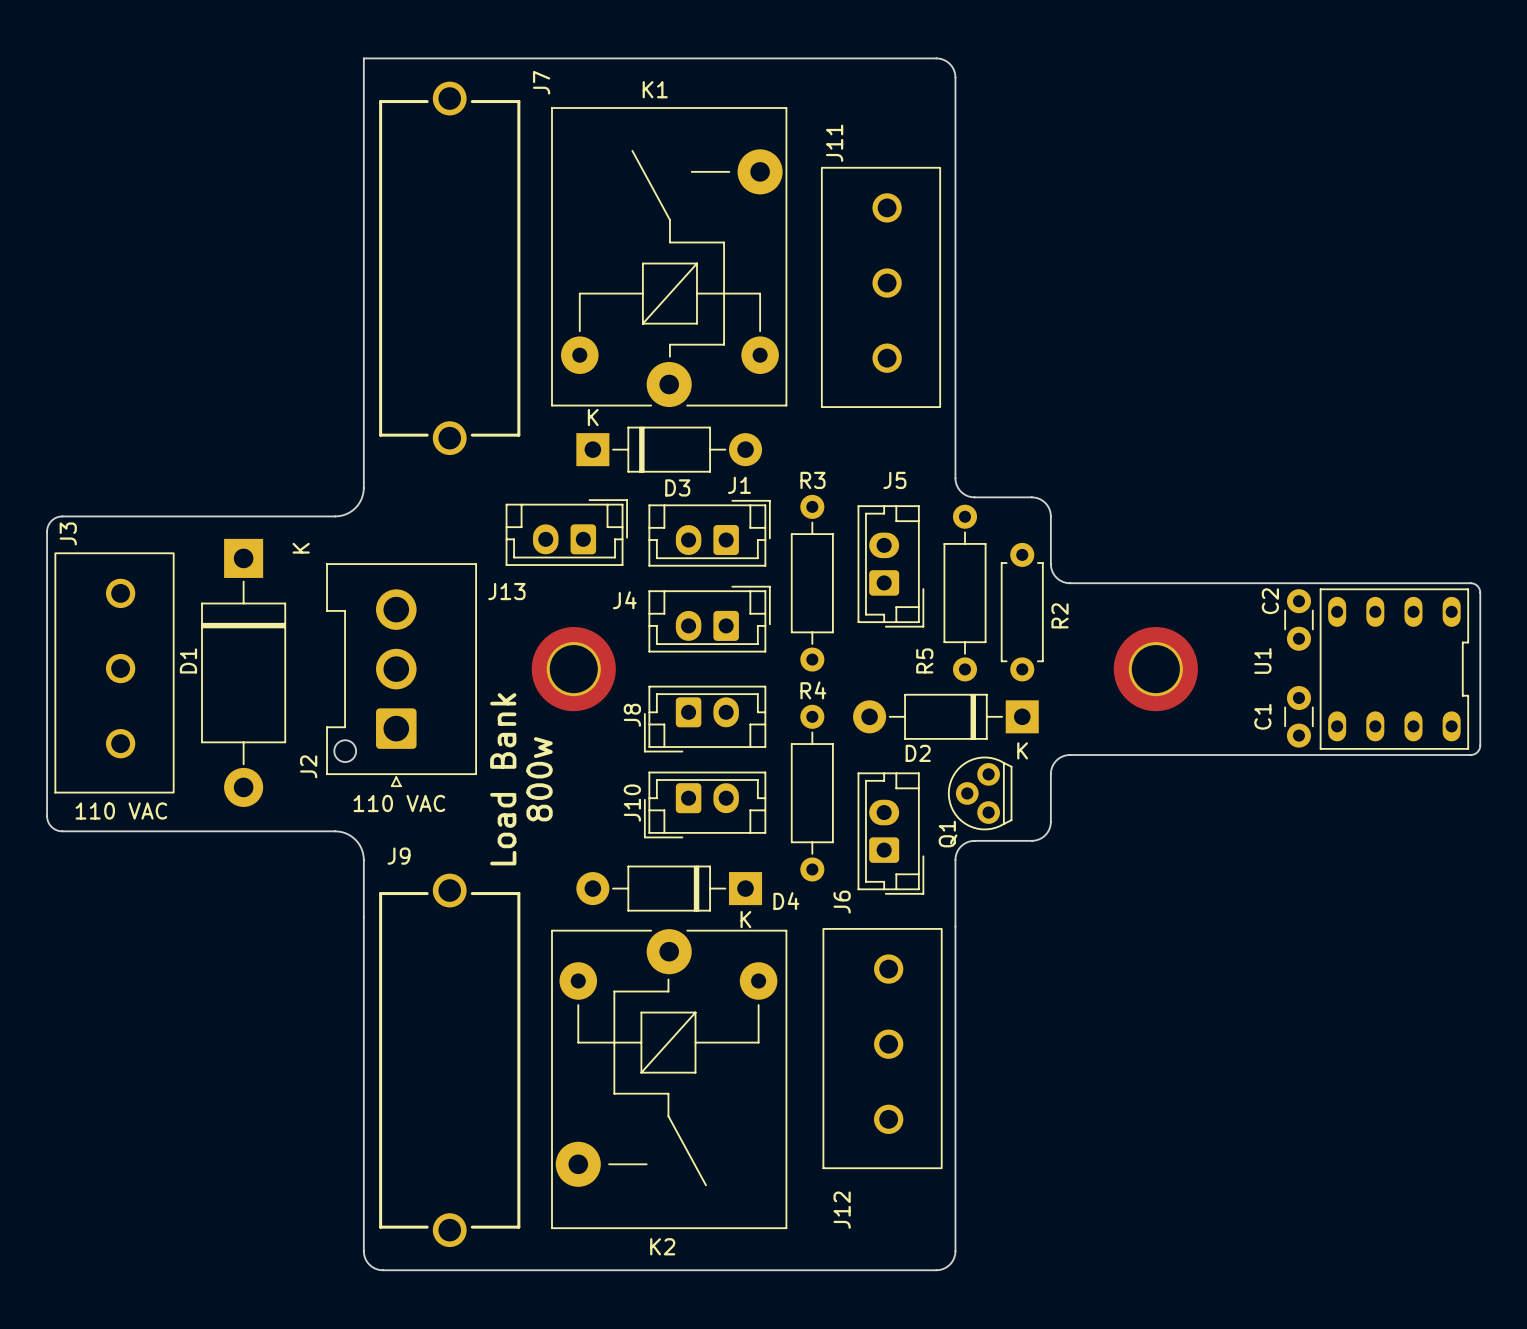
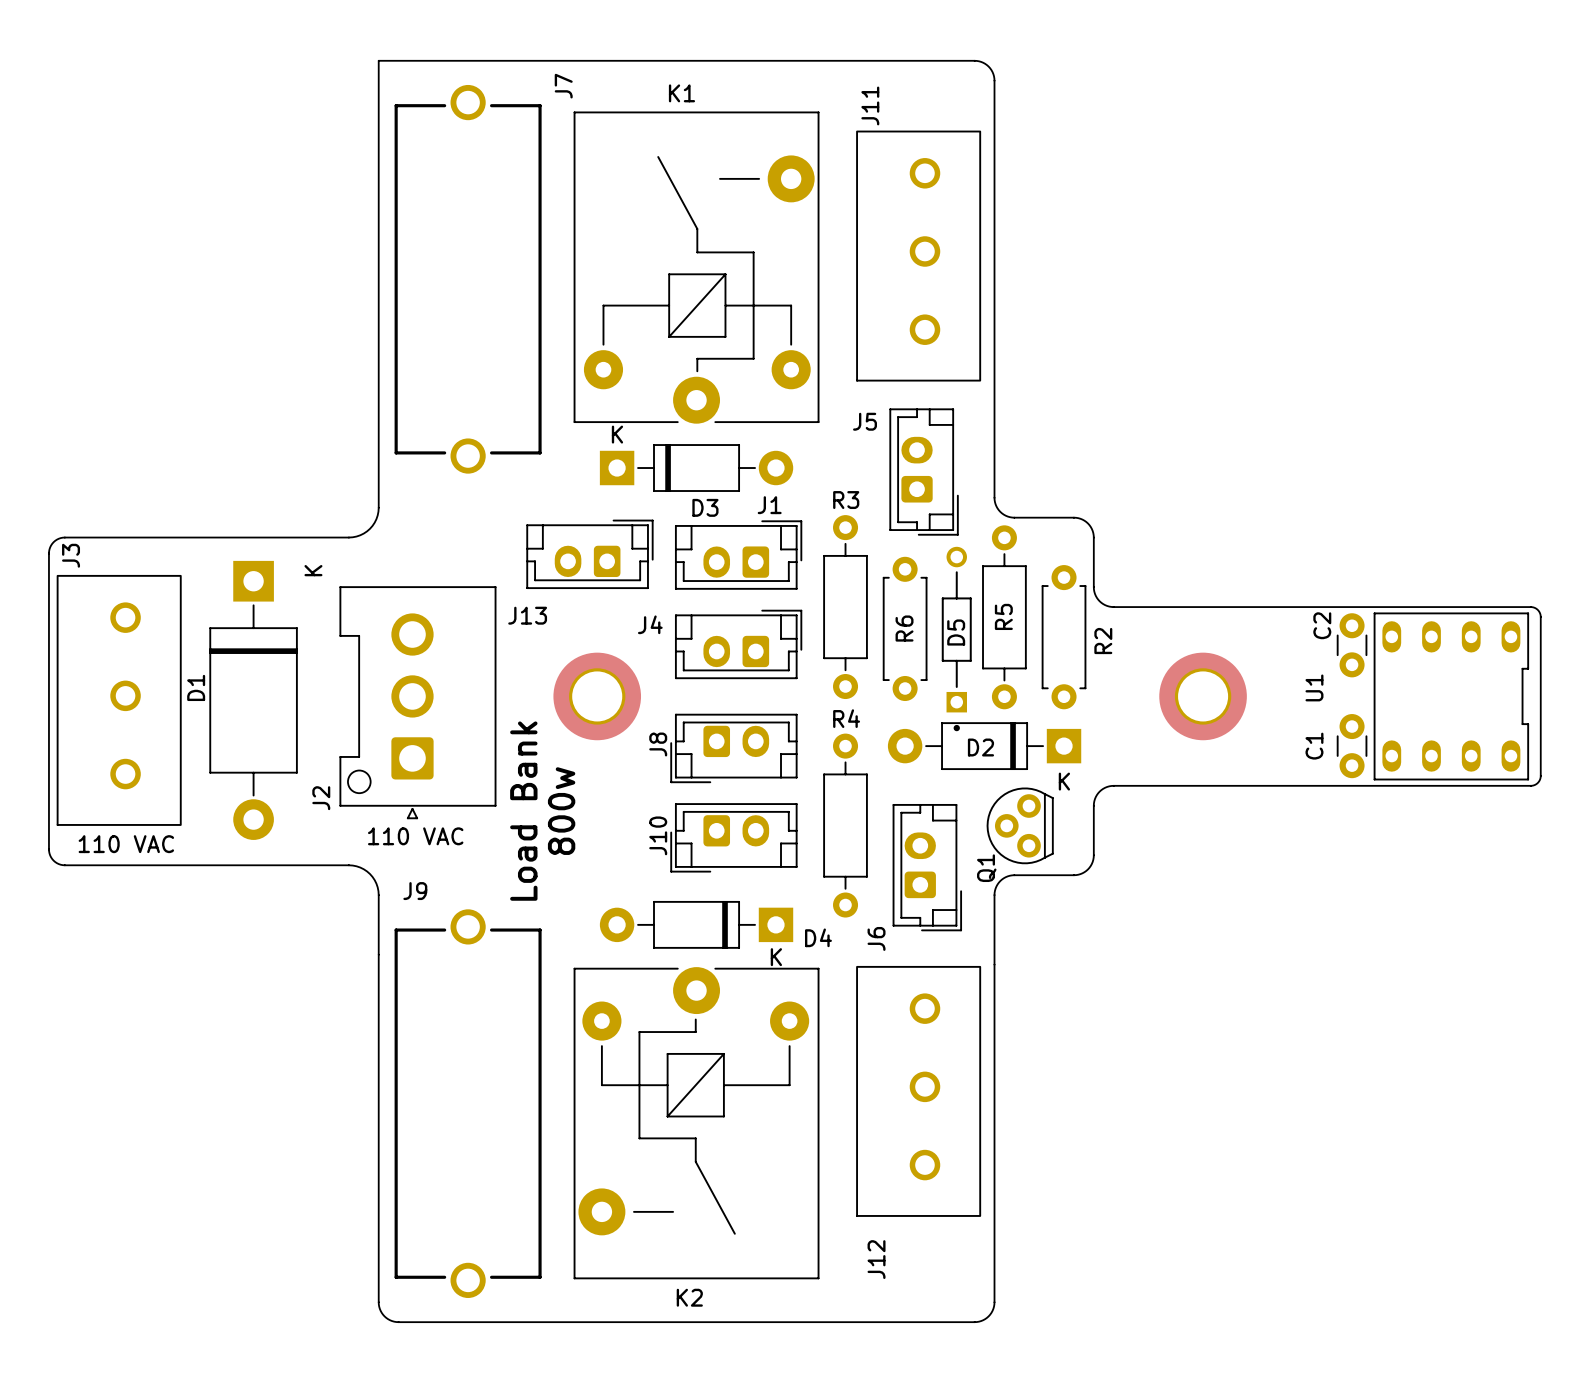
J11 position: (881, 287) -> (918, 256)
J5 name position: J5 (894, 480) -> J5 (865, 421)
J5 position: (890, 566) -> (924, 472)
R6: none -> (905, 628)
D5: none -> (956, 639)
R5 name position: R5 (924, 660) -> R5 (1003, 616)
D2 name position: D2 (918, 753) -> D2 (980, 747)

